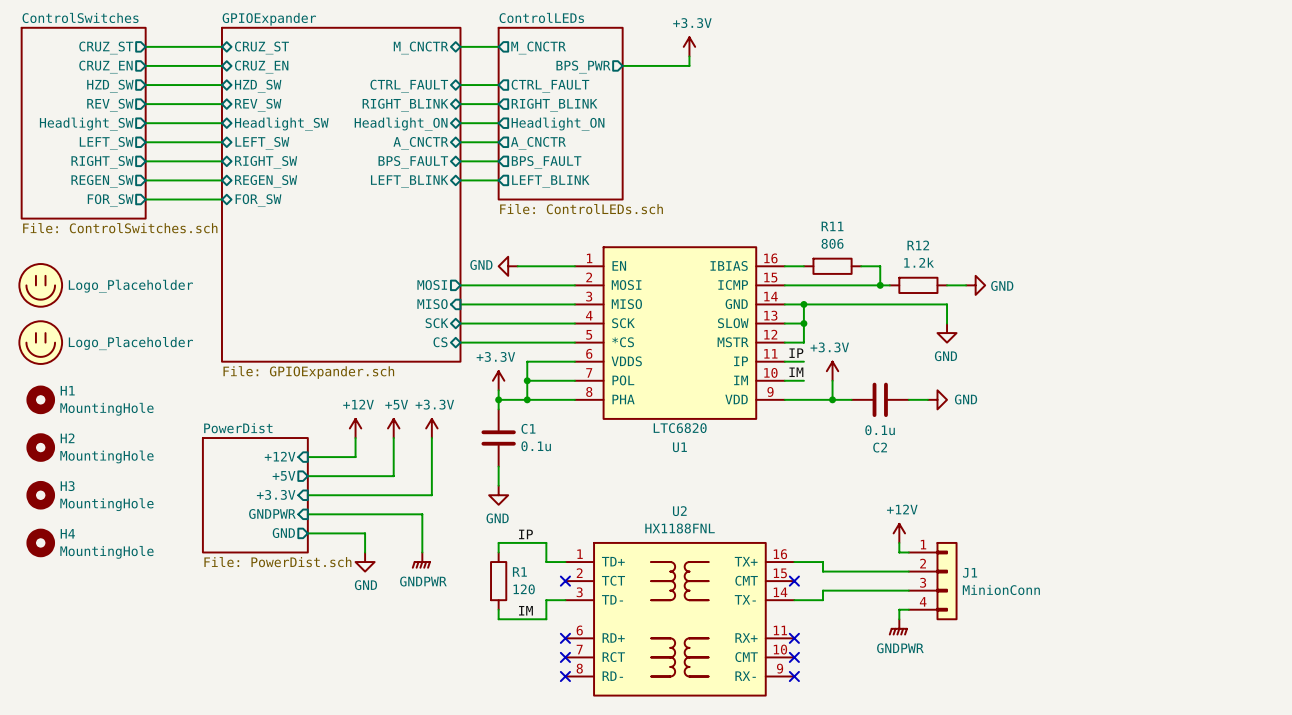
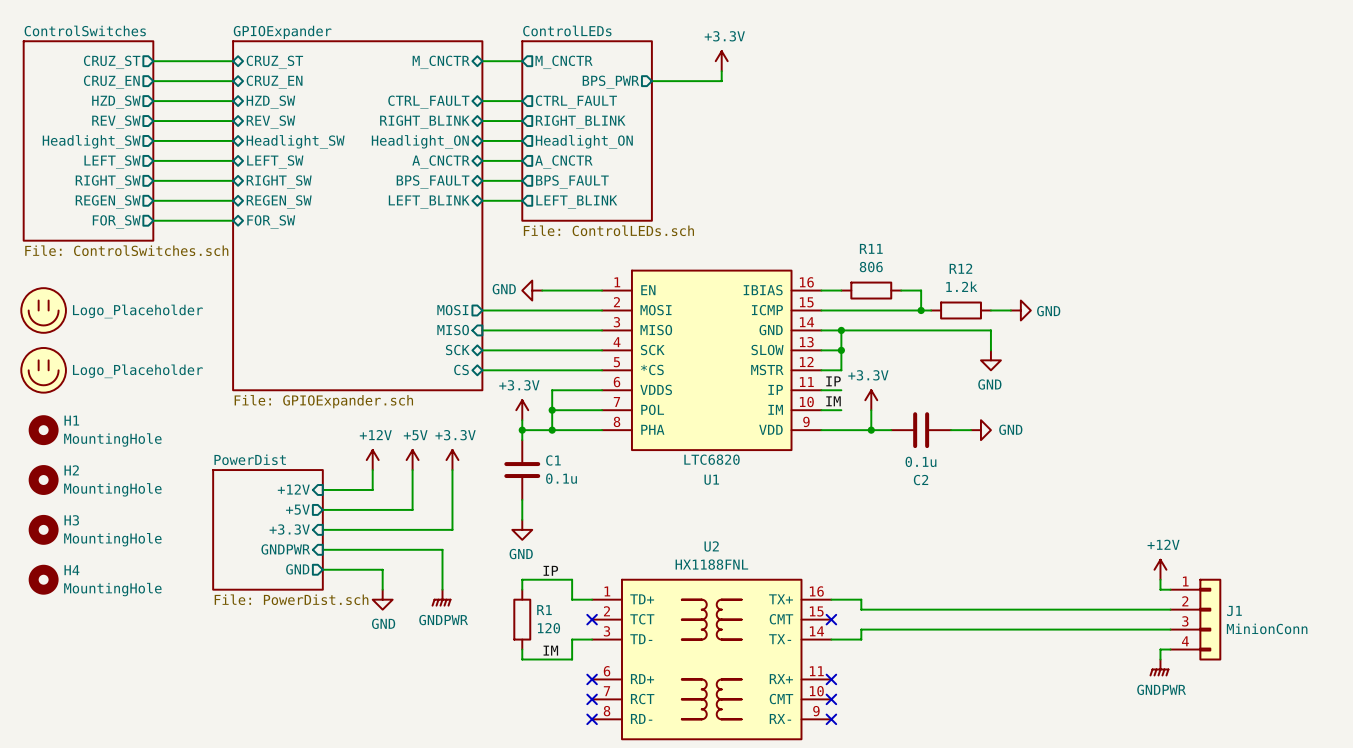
power symbol: +12V (899, 533) -> none
power symbol: none -> +12V (1160, 569)
wire: (899, 542) (899, 552) (908, 552) -> none
wire: none -> (1160, 579) (1160, 589) (1170, 589)
wire: none -> (951, 609) (1170, 609)
J1 position: (933, 581) -> (1195, 619)
wire: none -> (951, 629) (1170, 629)
wire: (908, 609) (899, 609) (899, 619) -> none
wire: none -> (1170, 649) (1160, 649) (1160, 659)
power symbol: GNDPWR (898, 627) -> none
power symbol: none -> GNDPWR (1159, 667)

